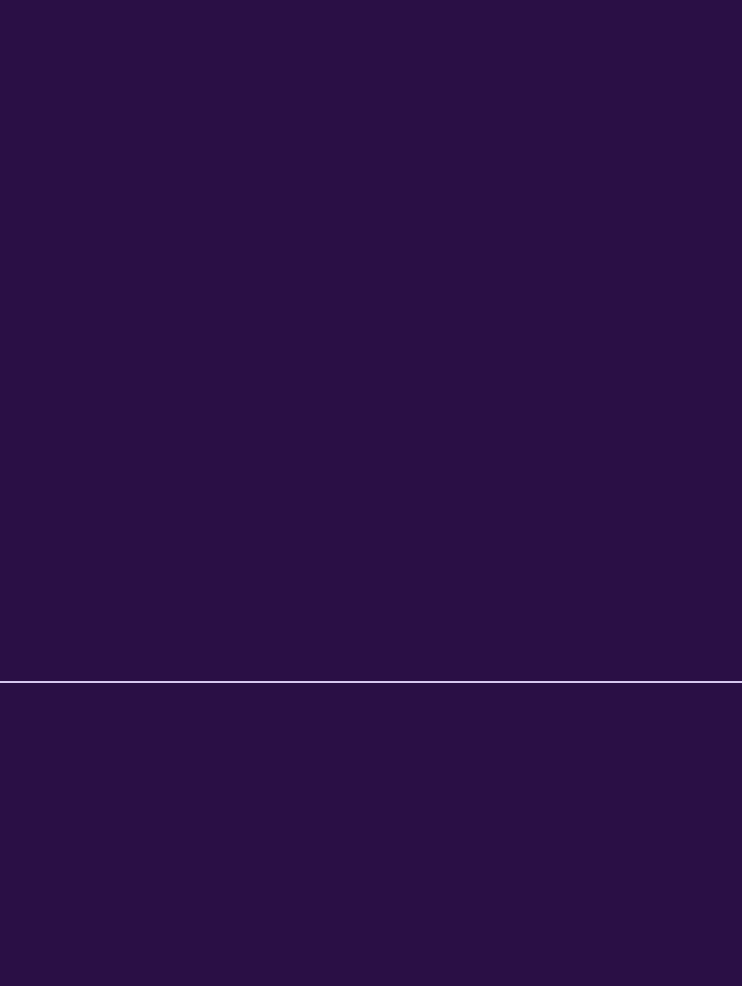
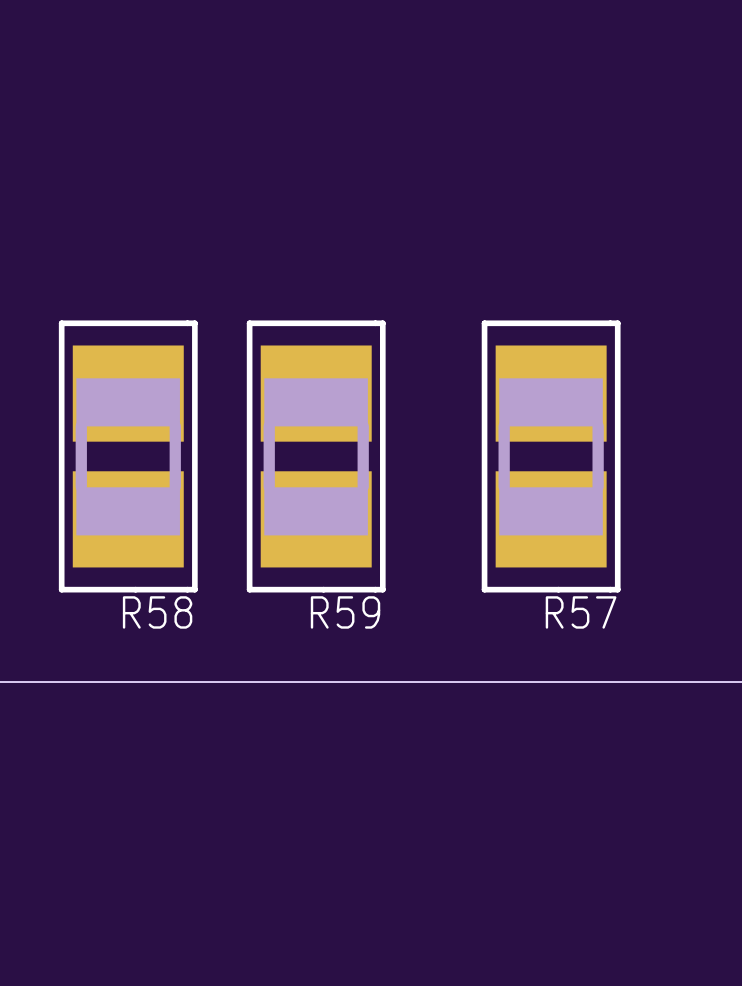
R58: none -> (128, 456)
R59: none -> (316, 456)
R57: none -> (551, 456)

